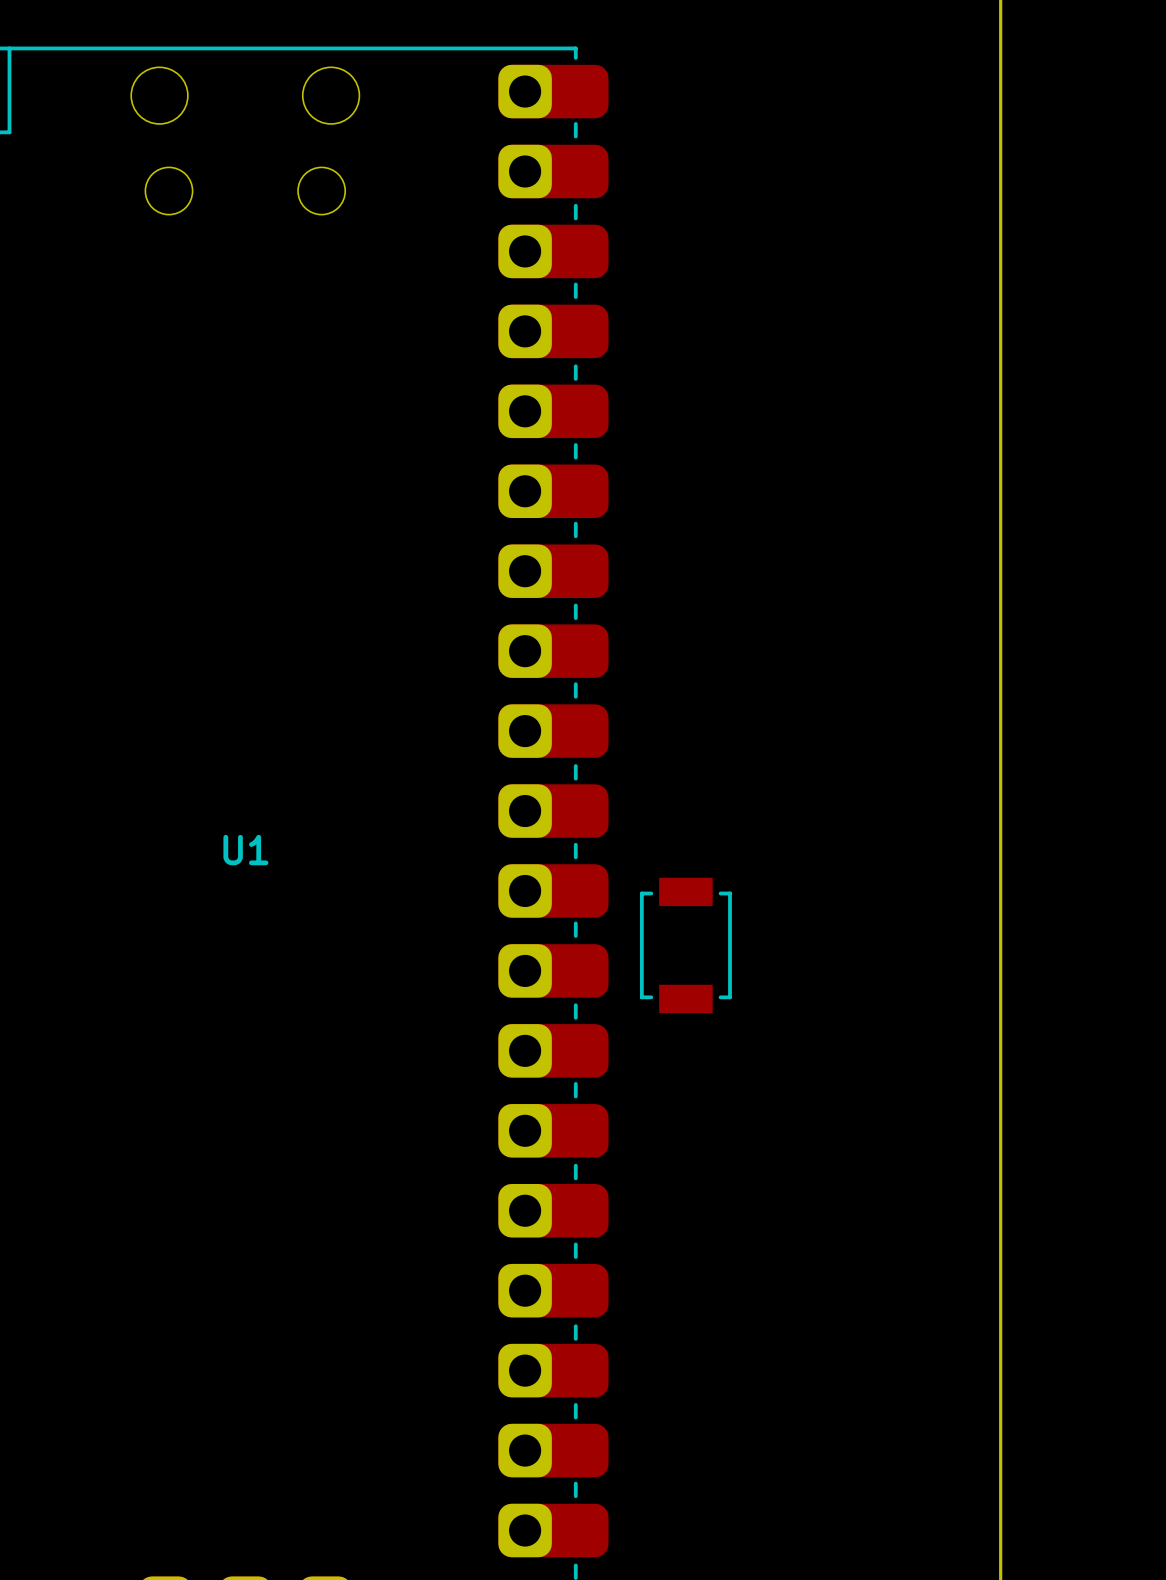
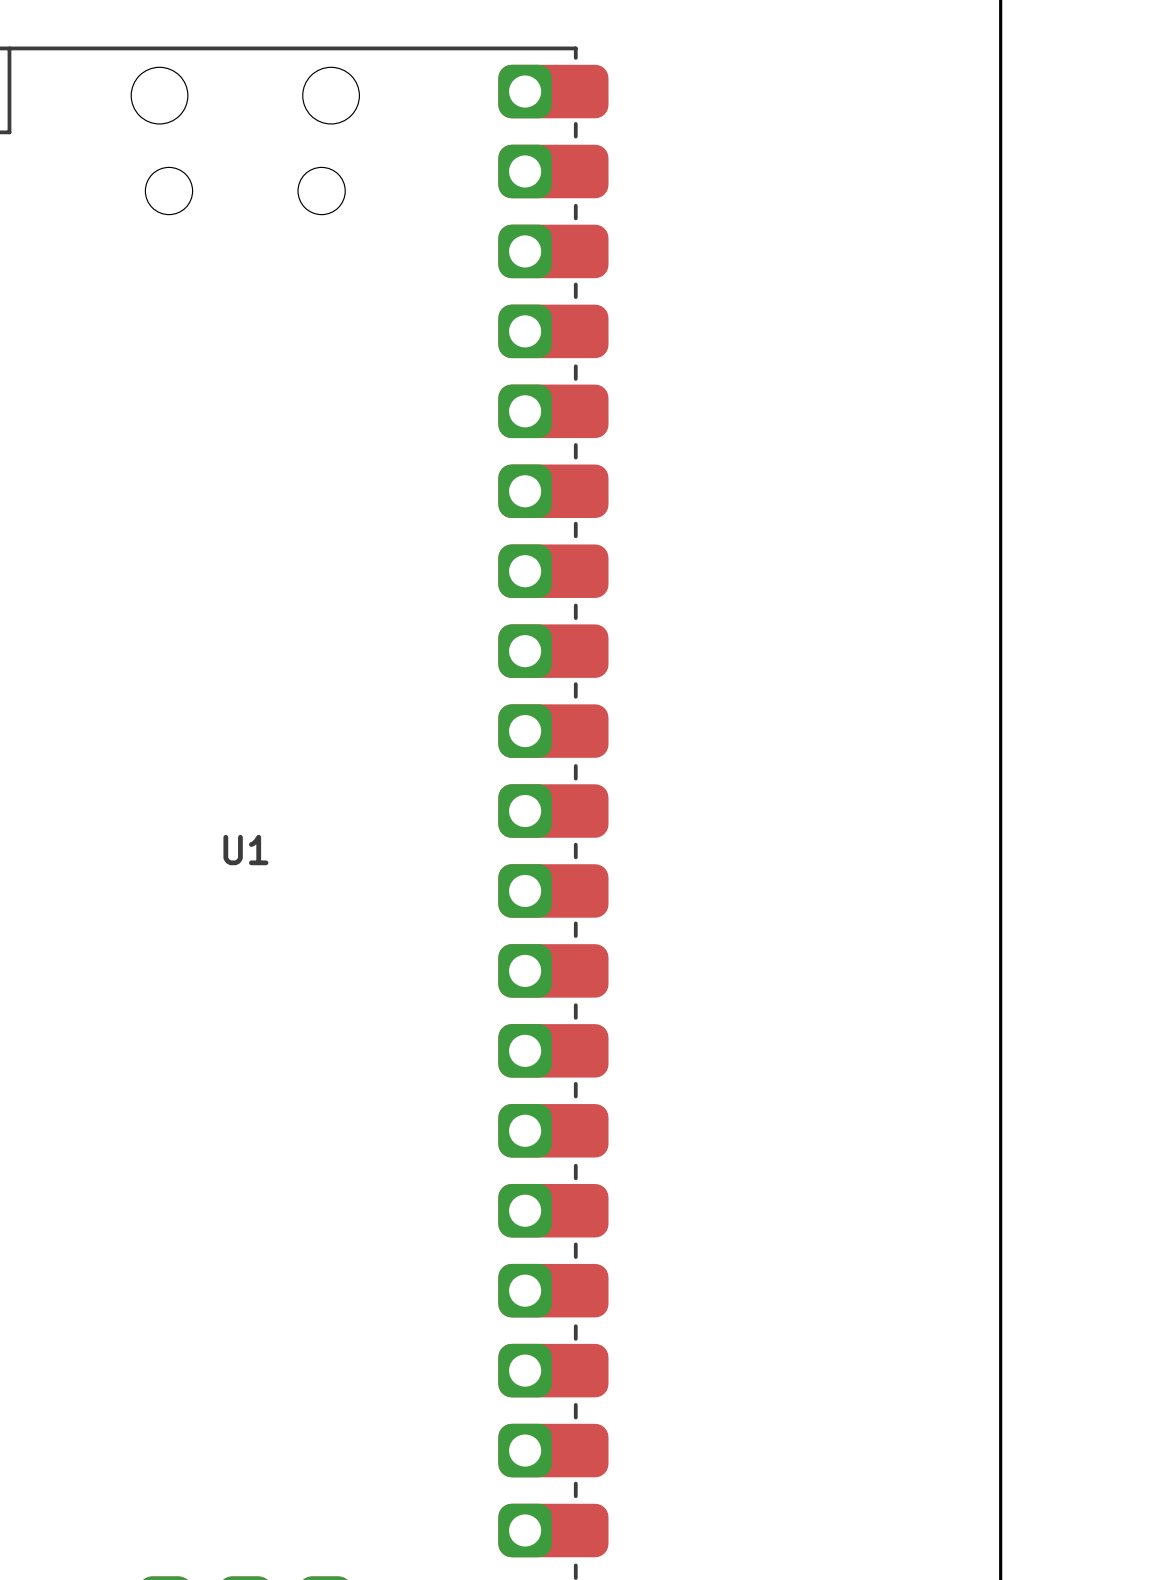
part: (685, 945) -> none

